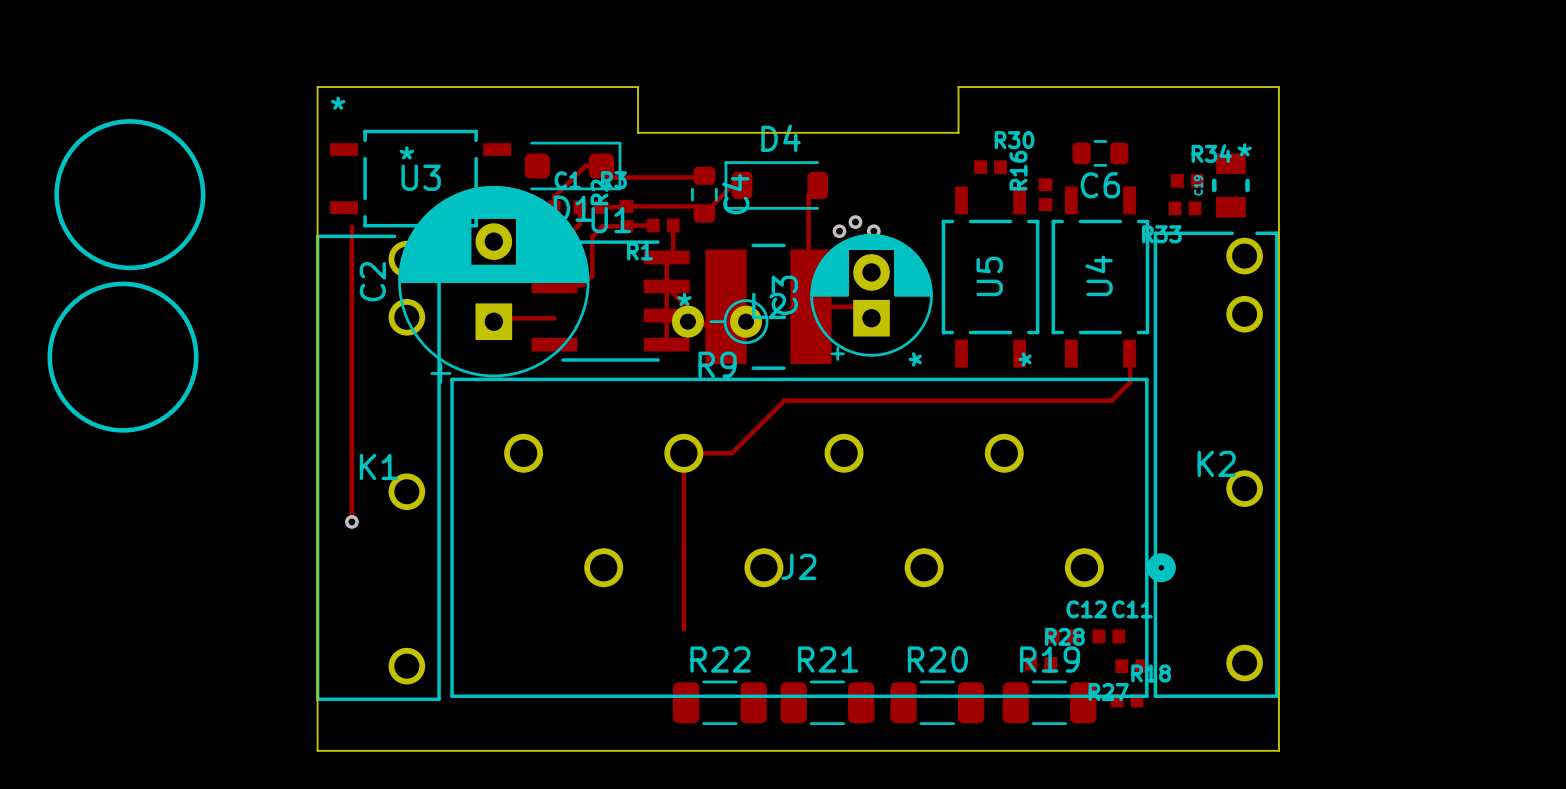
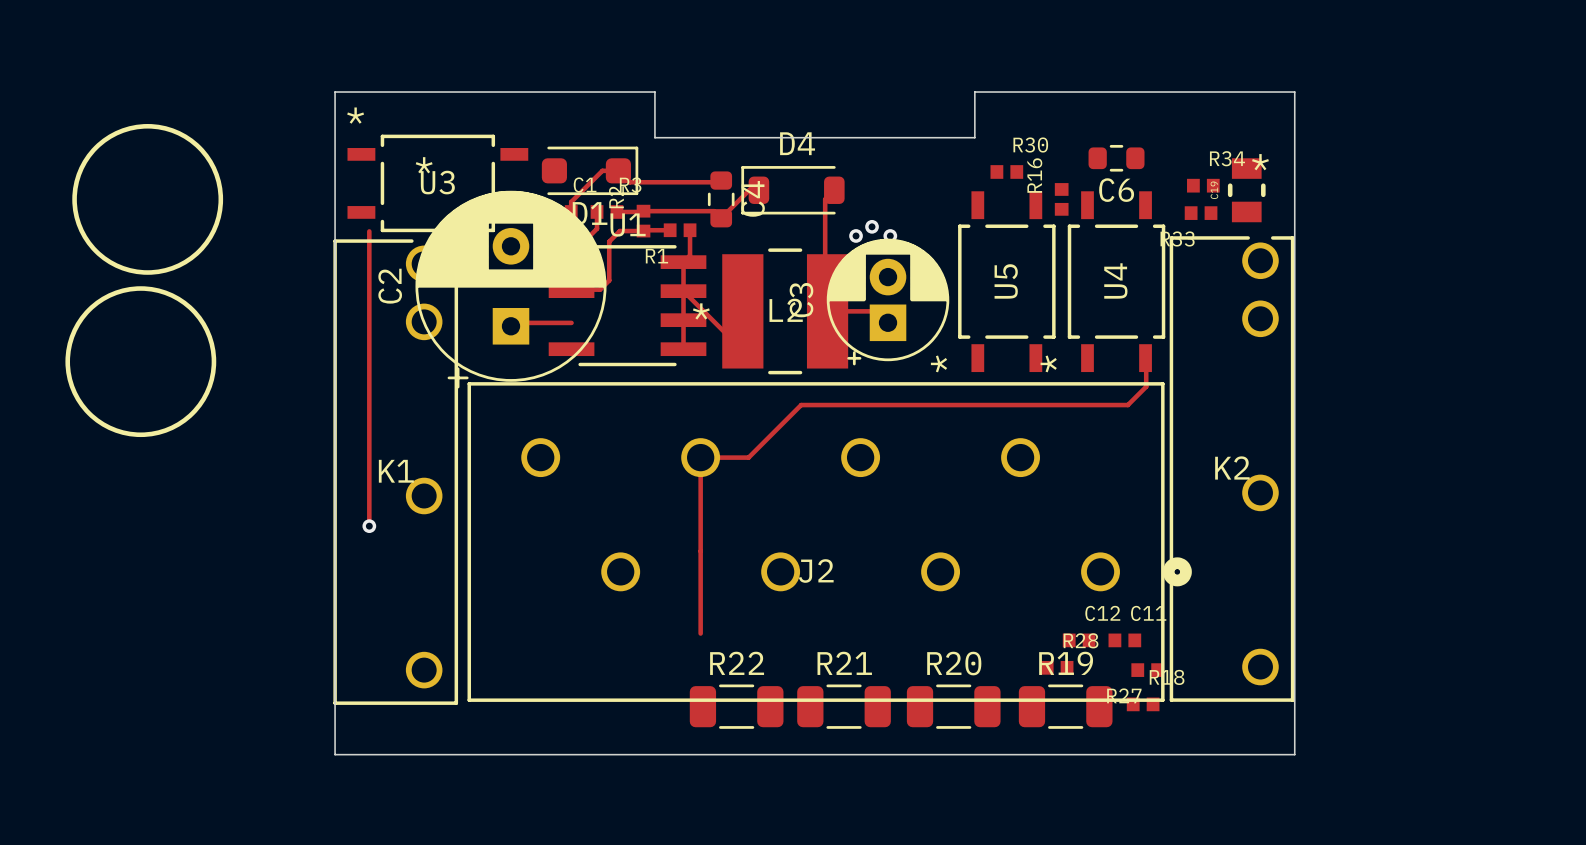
R9: (720, 321) -> none

